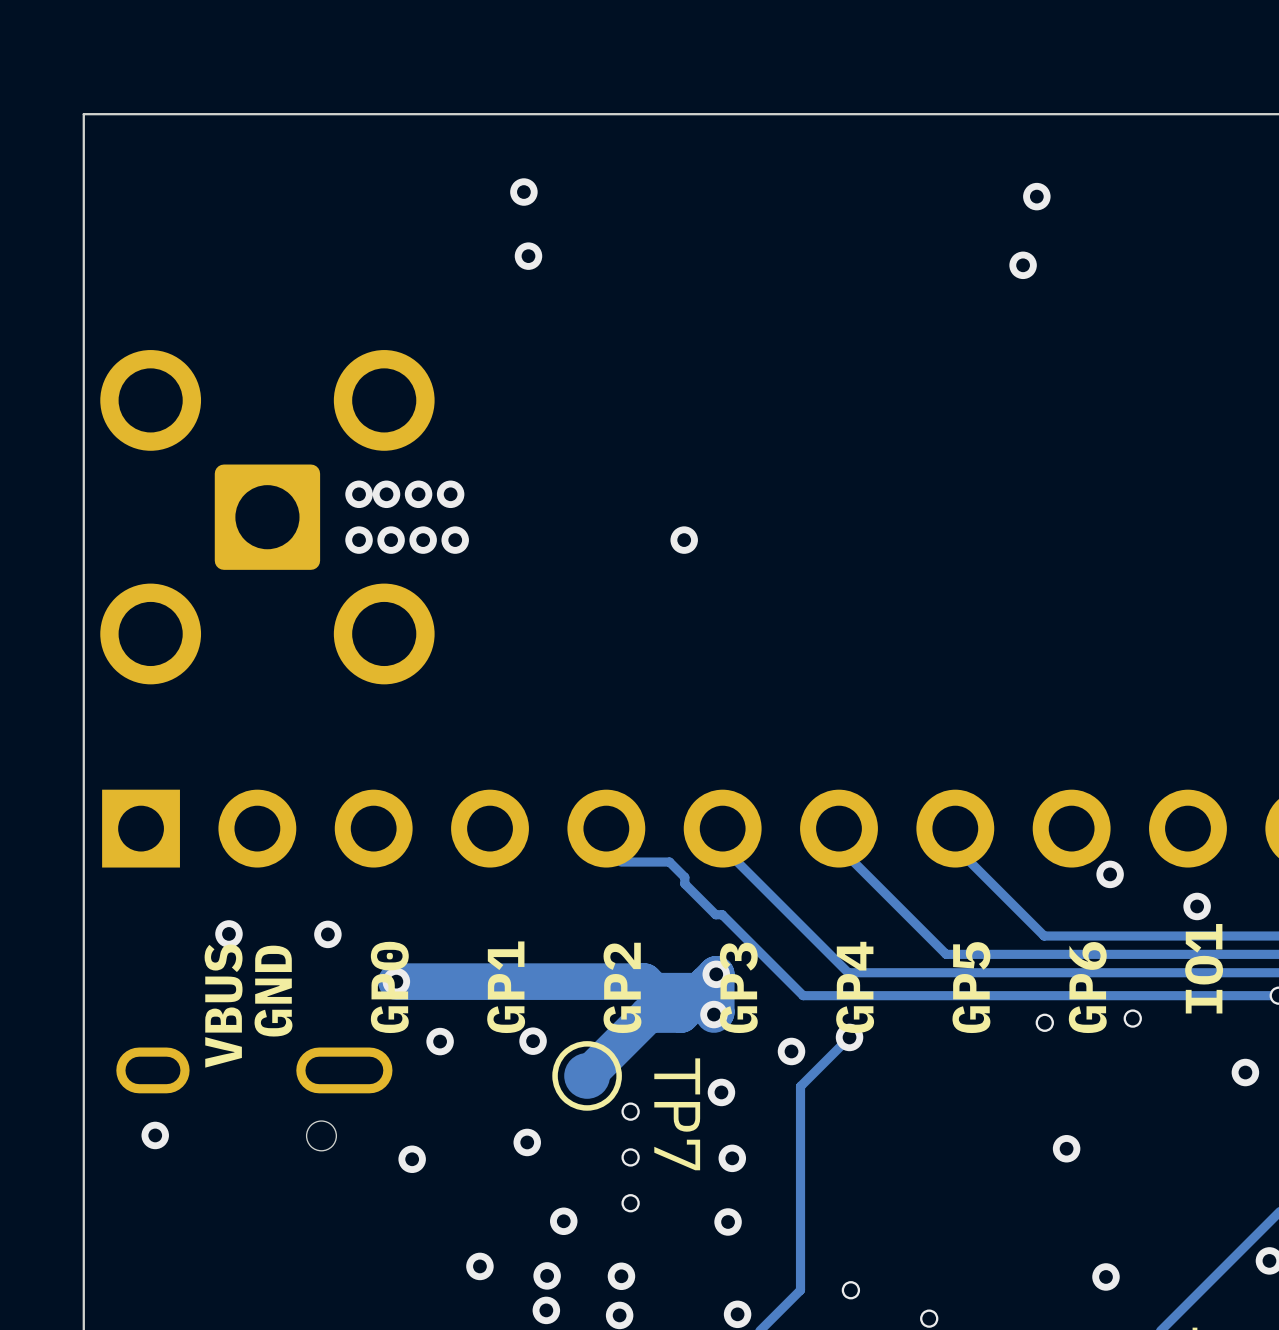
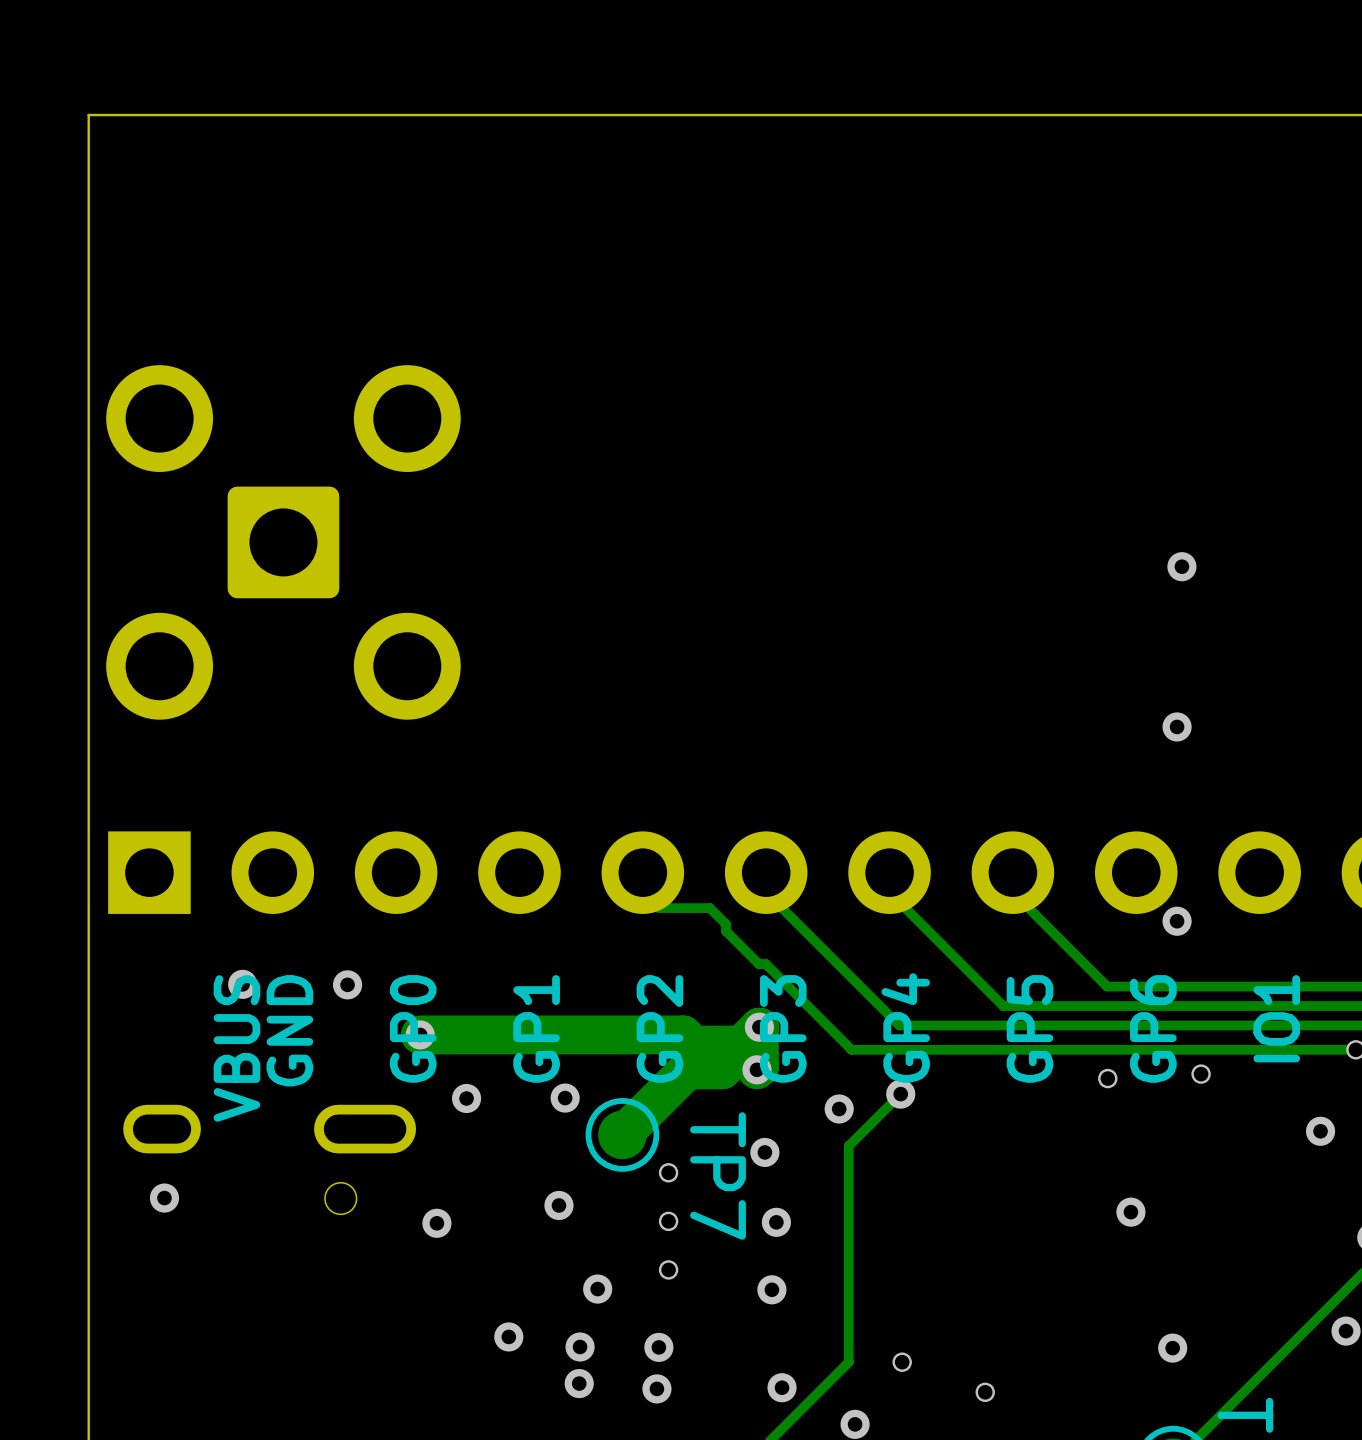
via: (523, 192) -> none
via: (1036, 196) -> none
via: (528, 256) -> none
via: (1023, 265) -> none
via: (359, 494) -> none
via: (386, 494) -> none
via: (418, 494) -> none
via: (450, 494) -> none
via: (359, 540) -> none
via: (391, 540) -> none
via: (423, 540) -> none
via: (455, 540) -> none
via: (684, 540) -> none
via: none -> (1181, 566)
via: none -> (1177, 726)
via: (1197, 906) -> none

